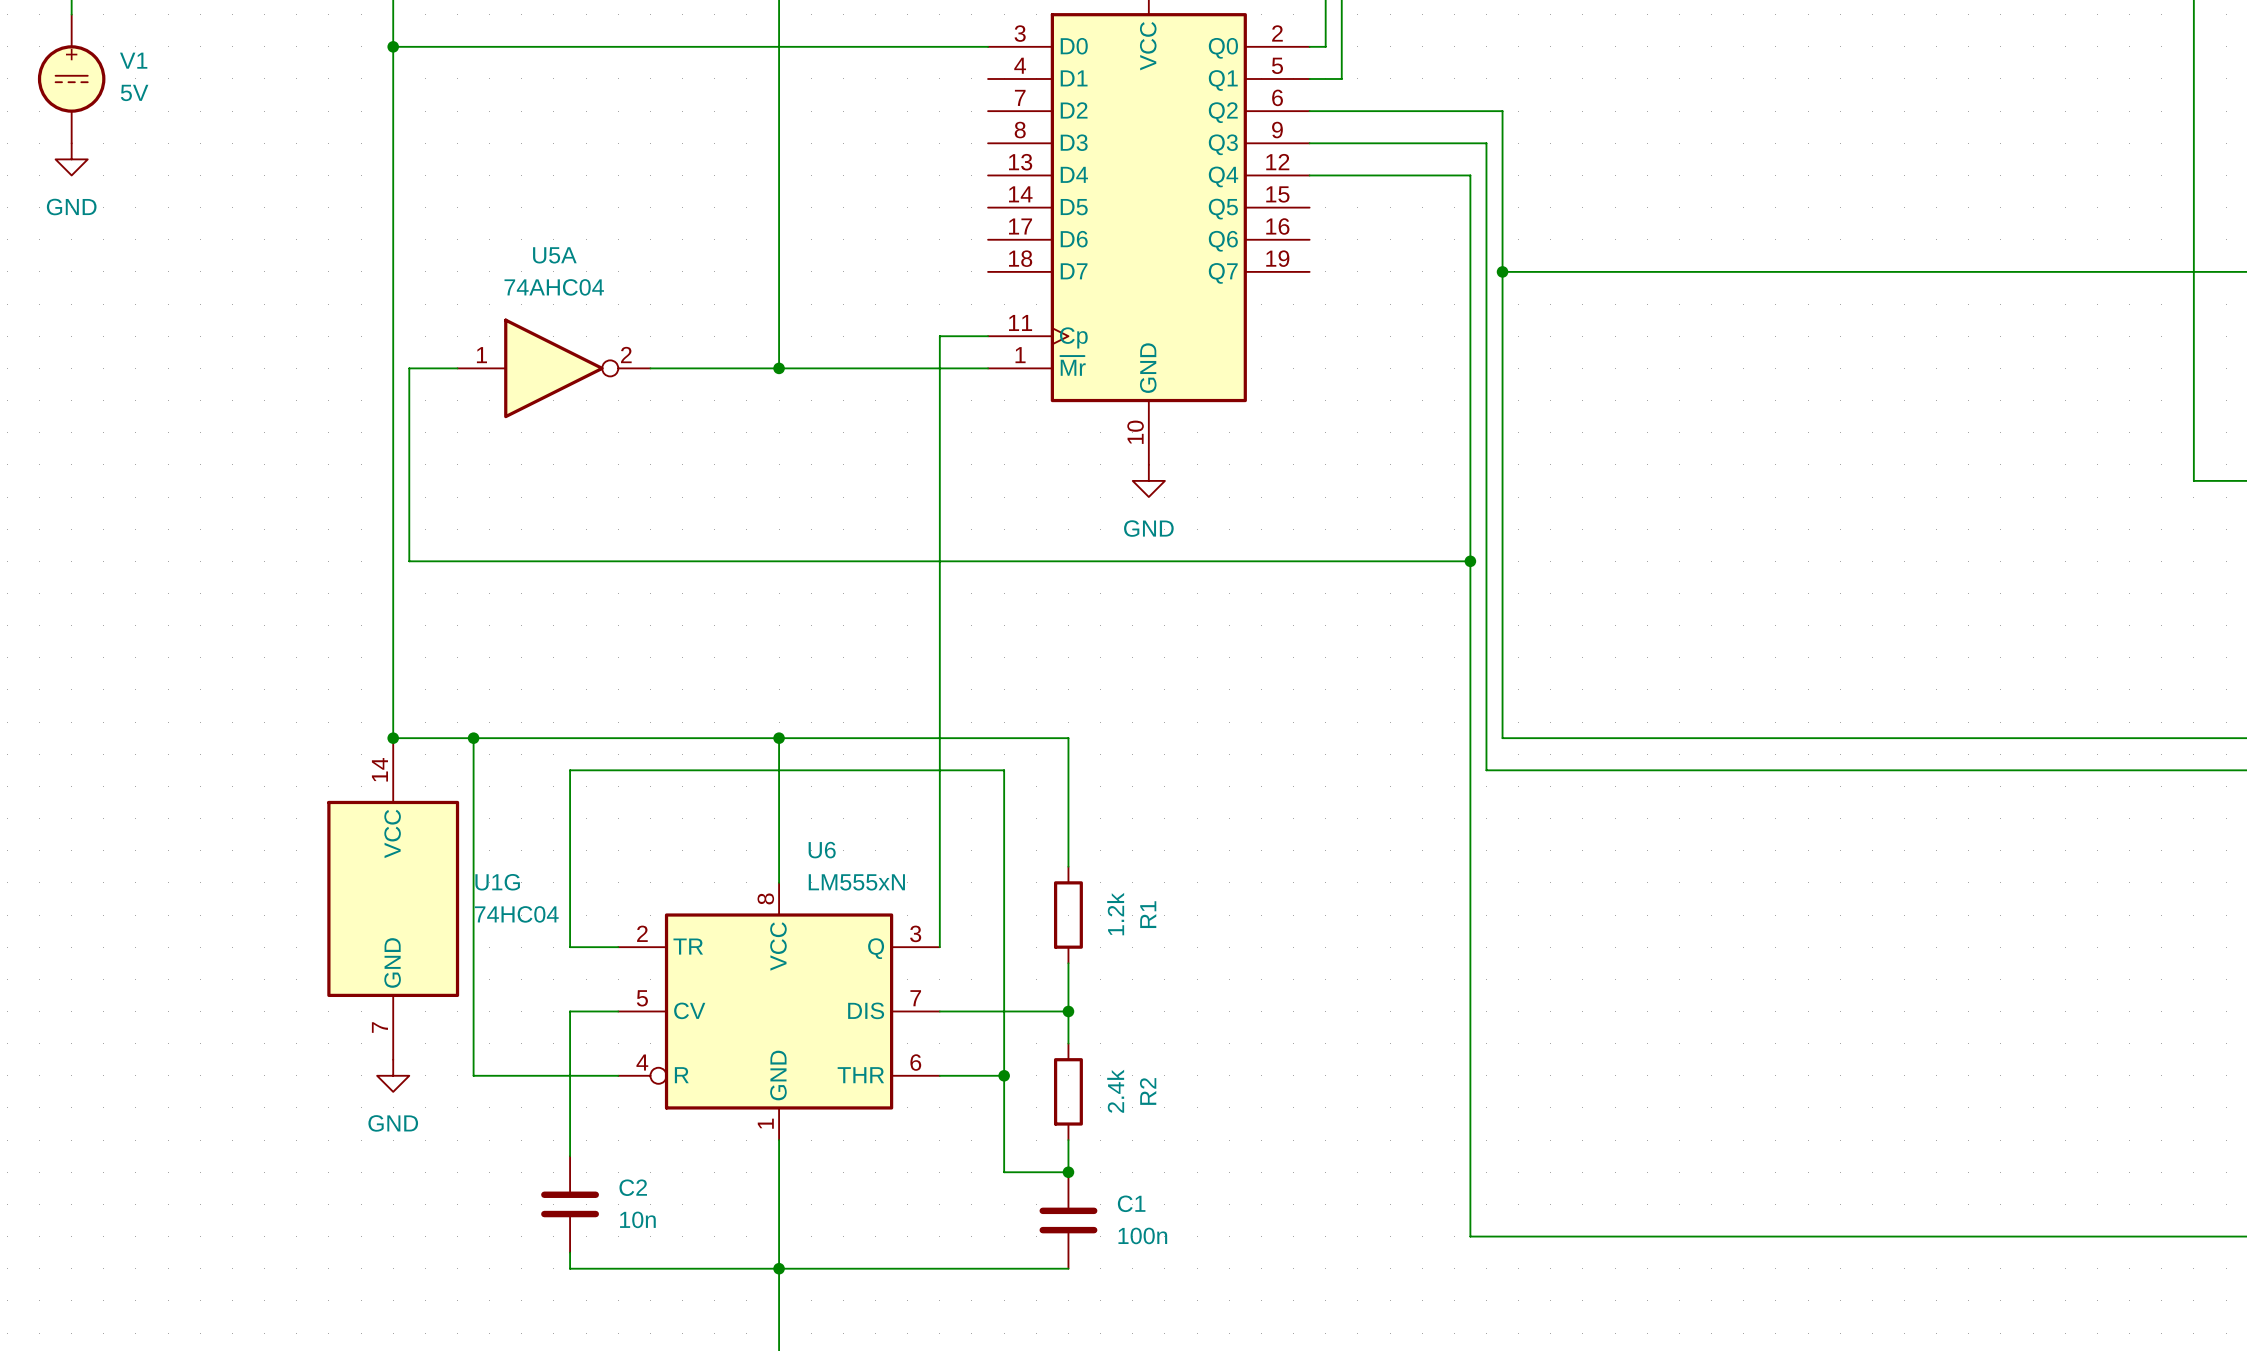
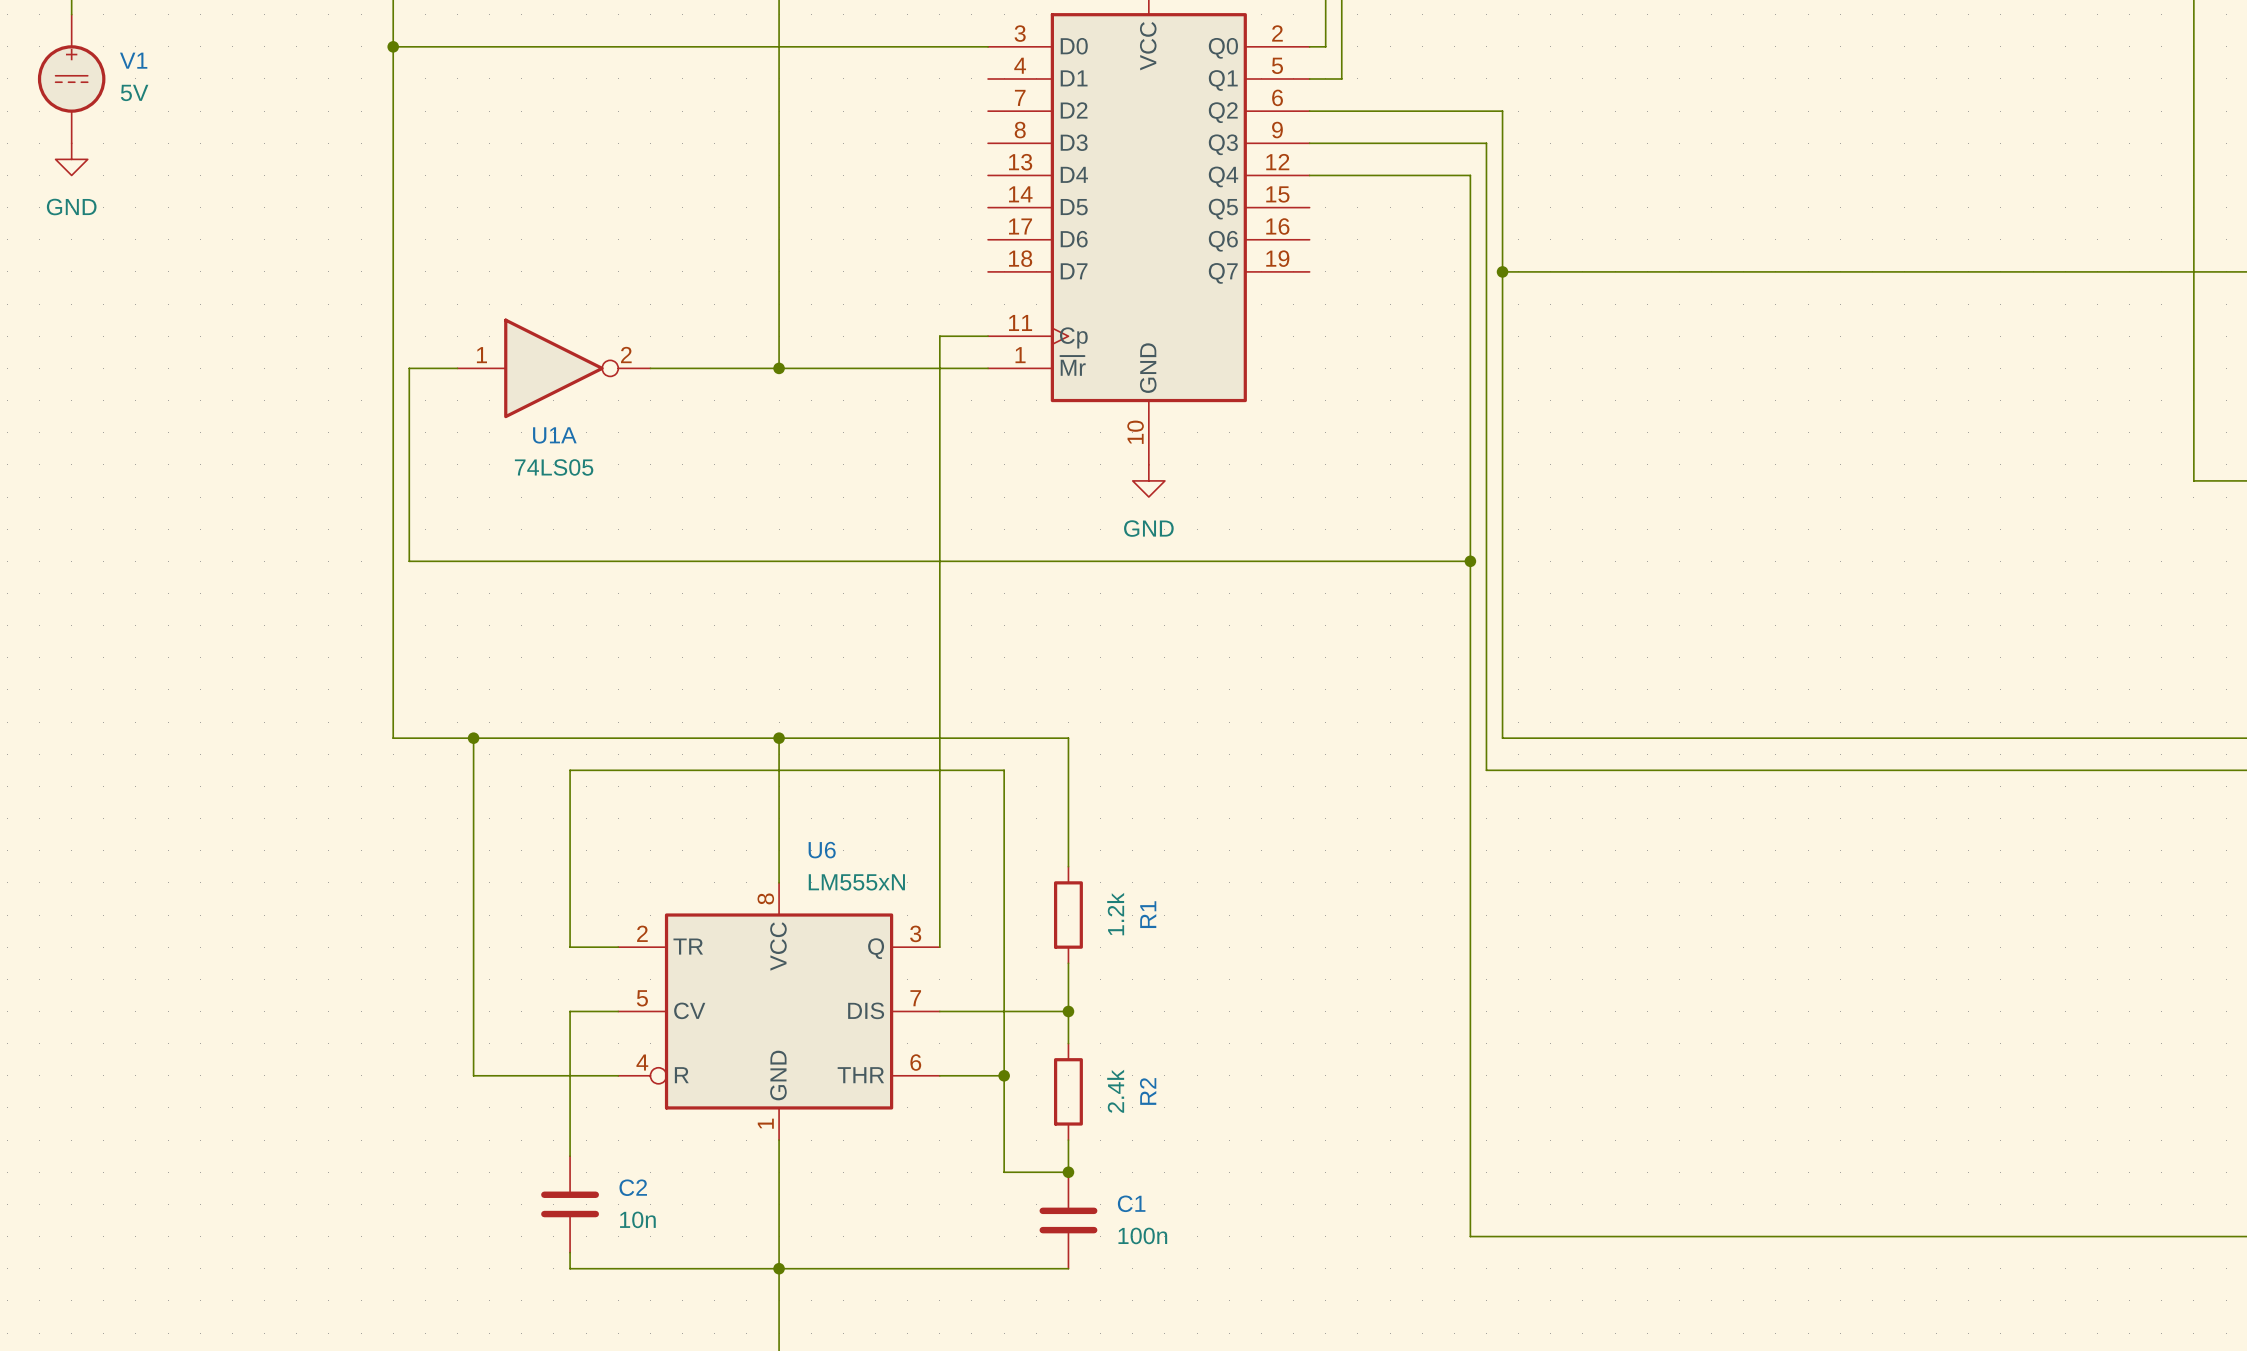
U5A name: U5A (554, 255) -> U1A (554, 435)
U5A value: 74AHC04 (554, 287) -> 74LS05 (554, 467)
junction: (393, 738) -> none
U1G: 74HC04 (393, 898) -> none
power symbol: GND (393, 1075) -> none

